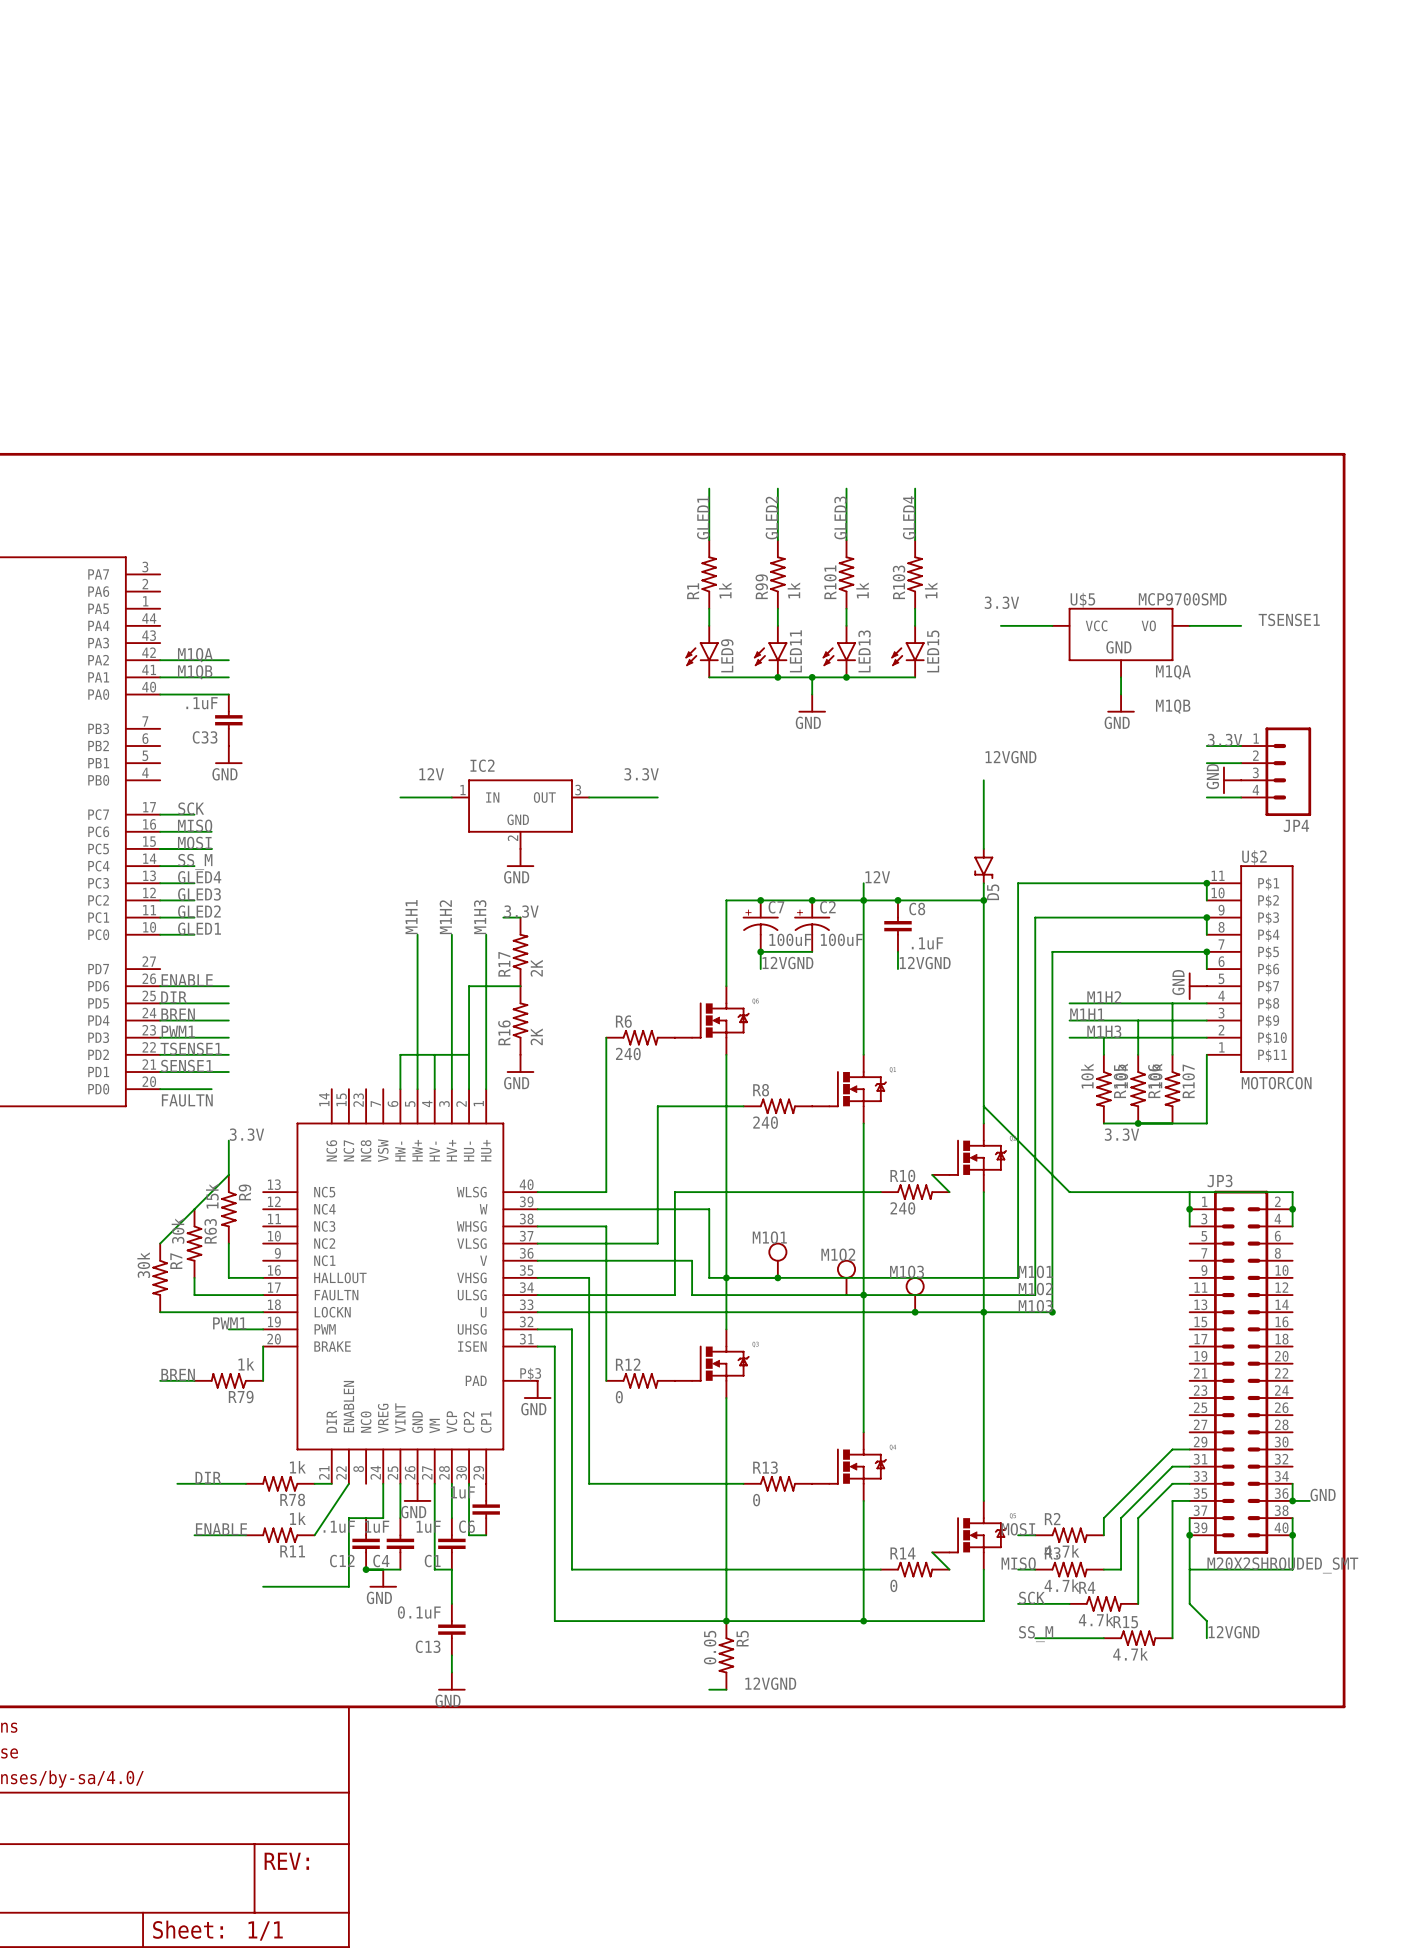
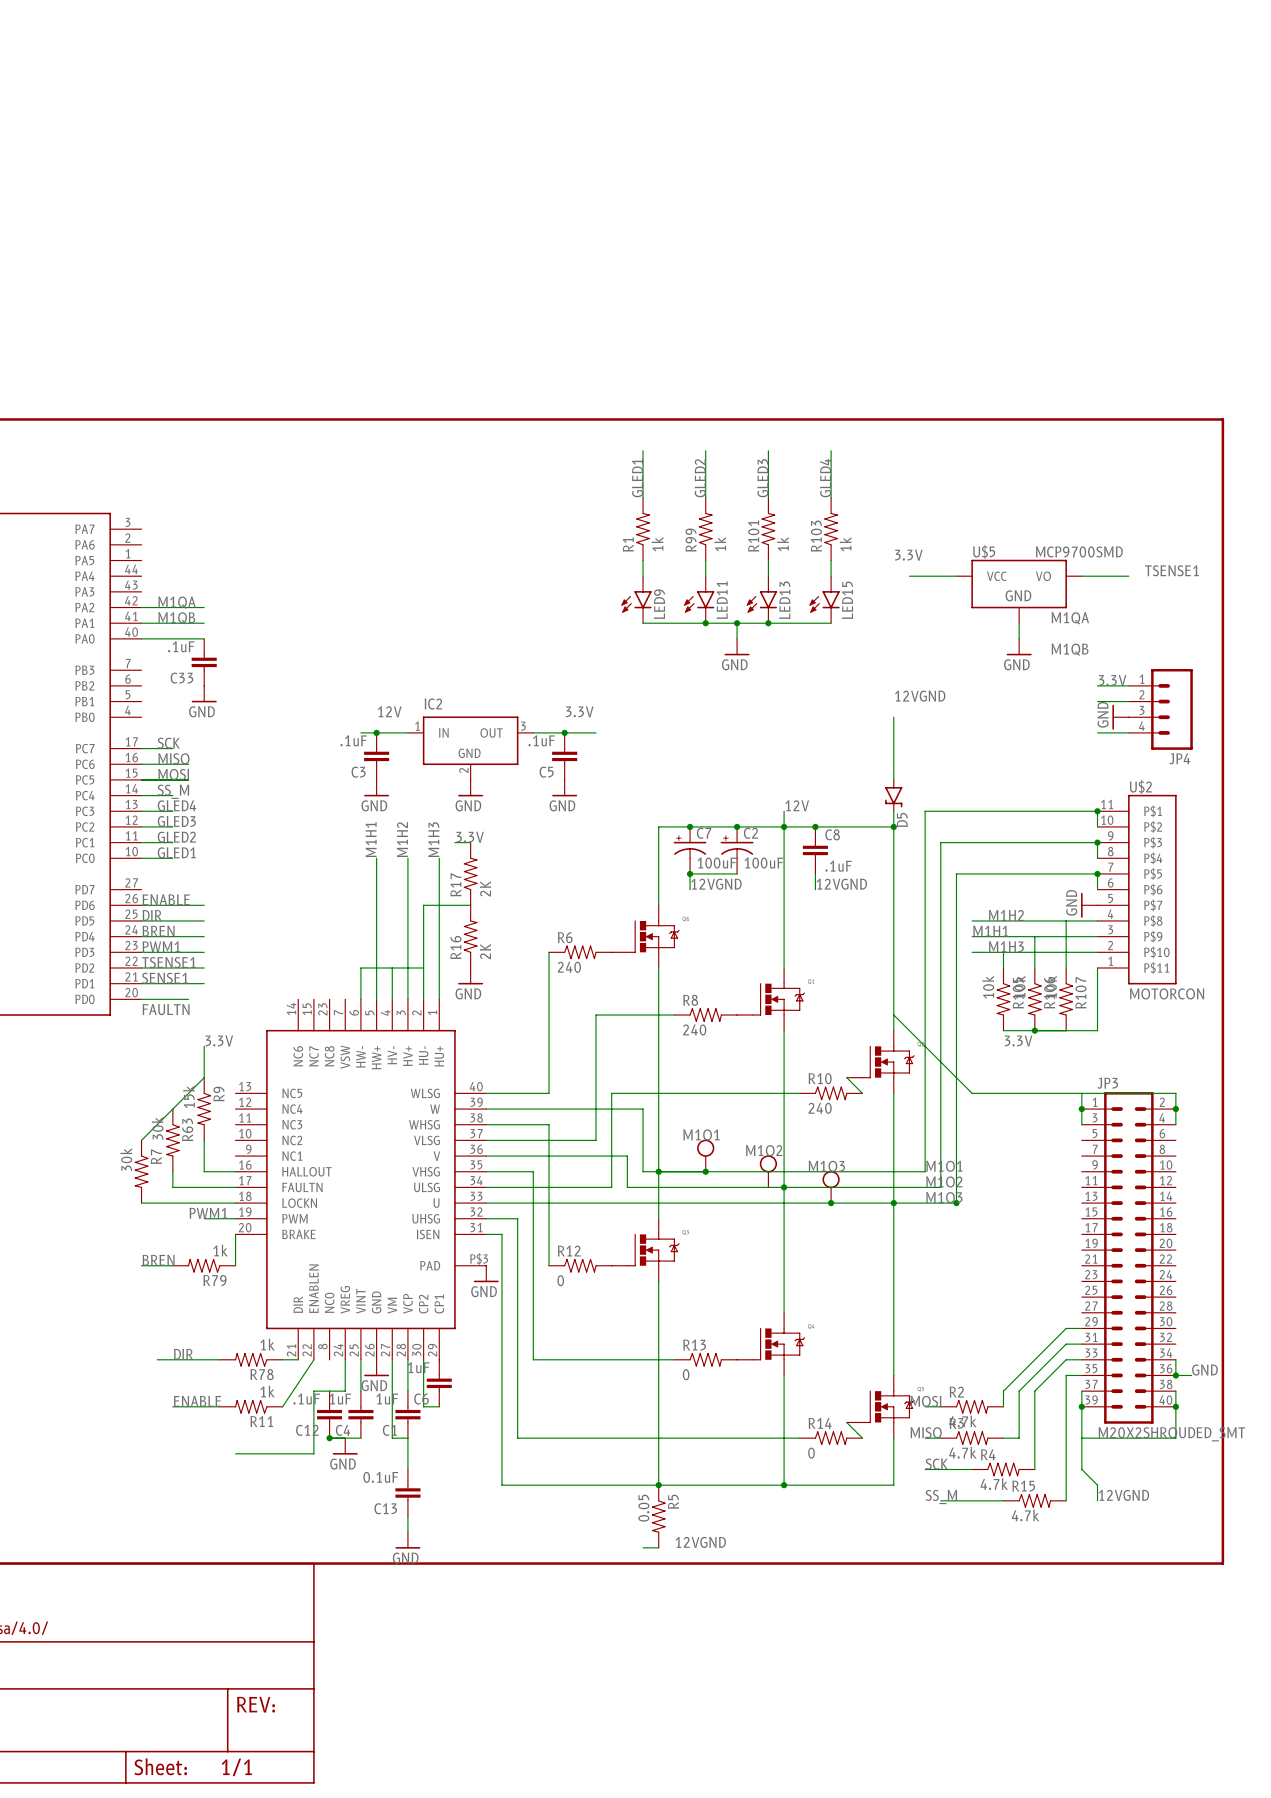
junction: none -> (376, 732)
junction: none -> (564, 732)
C3: none -> .1uF (376, 756)
C5: none -> .1uF (564, 756)
power symbol: none -> GND (376, 788)
power symbol: none -> GND (564, 788)

